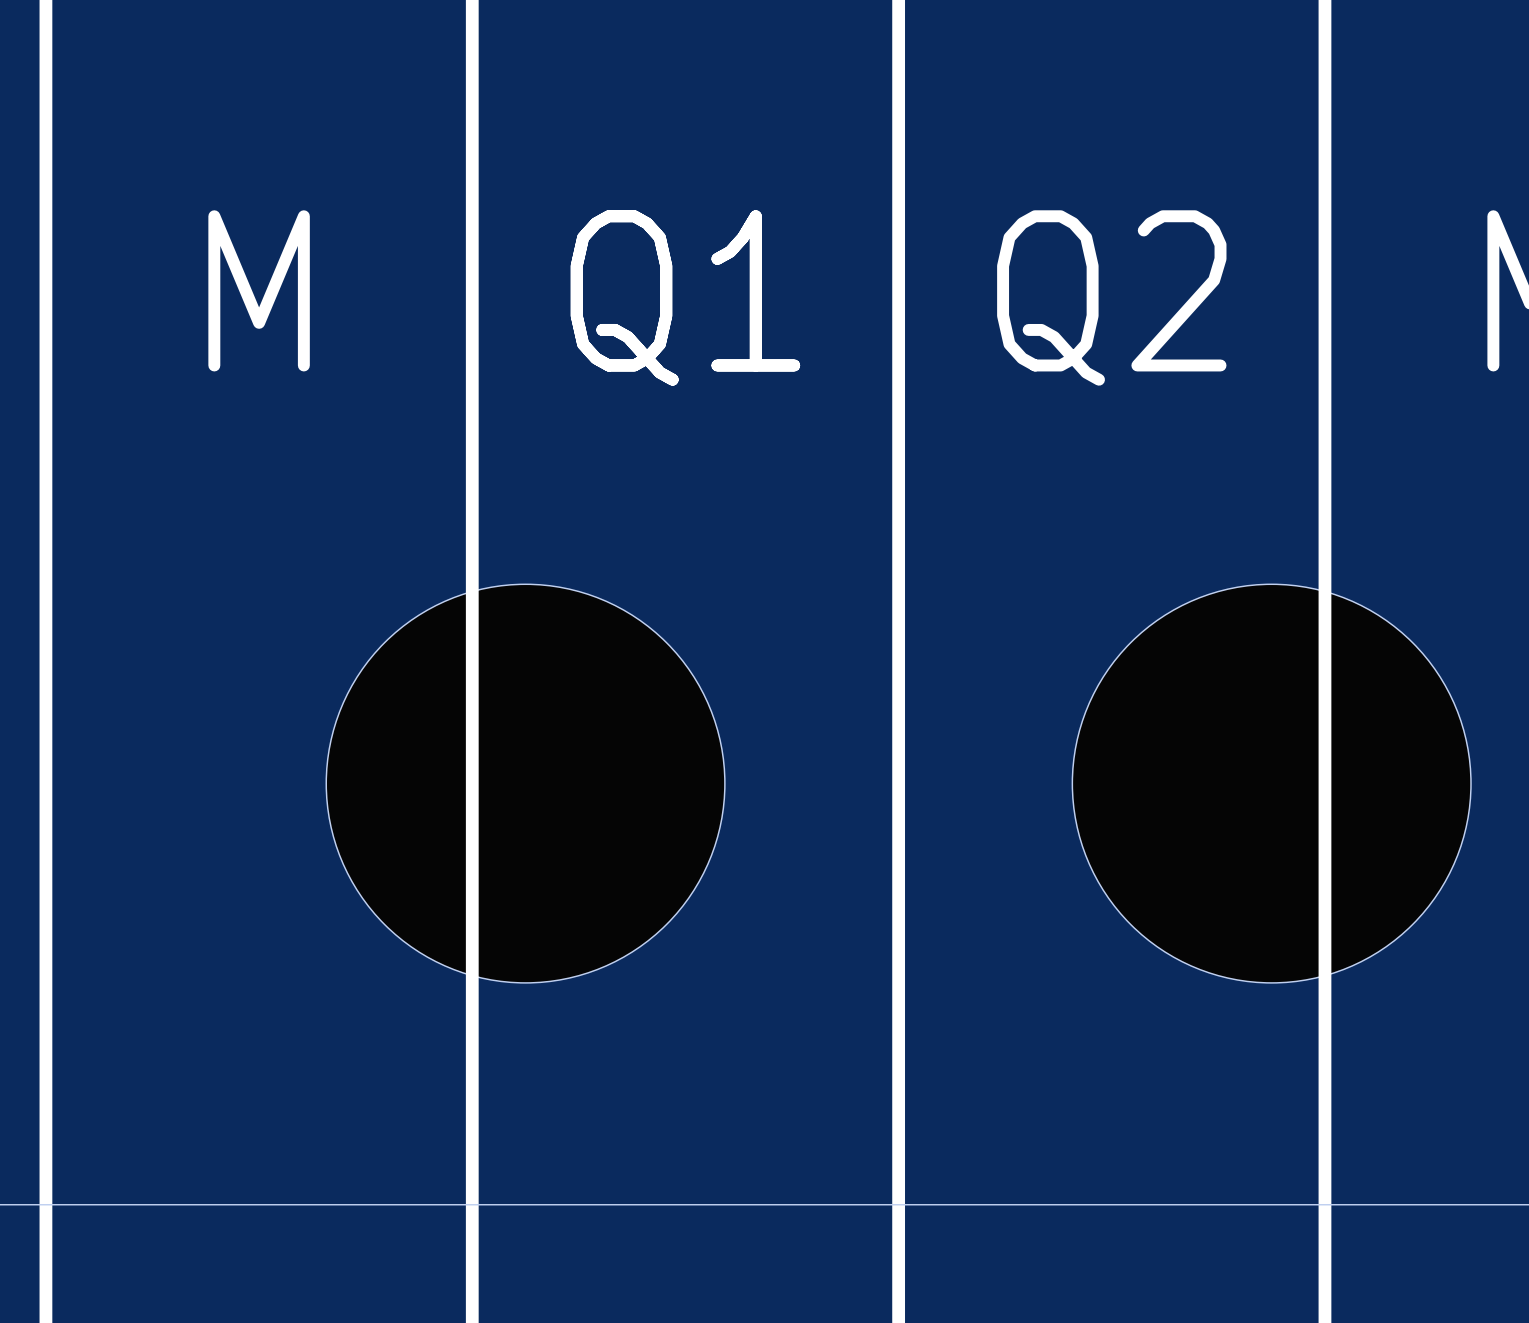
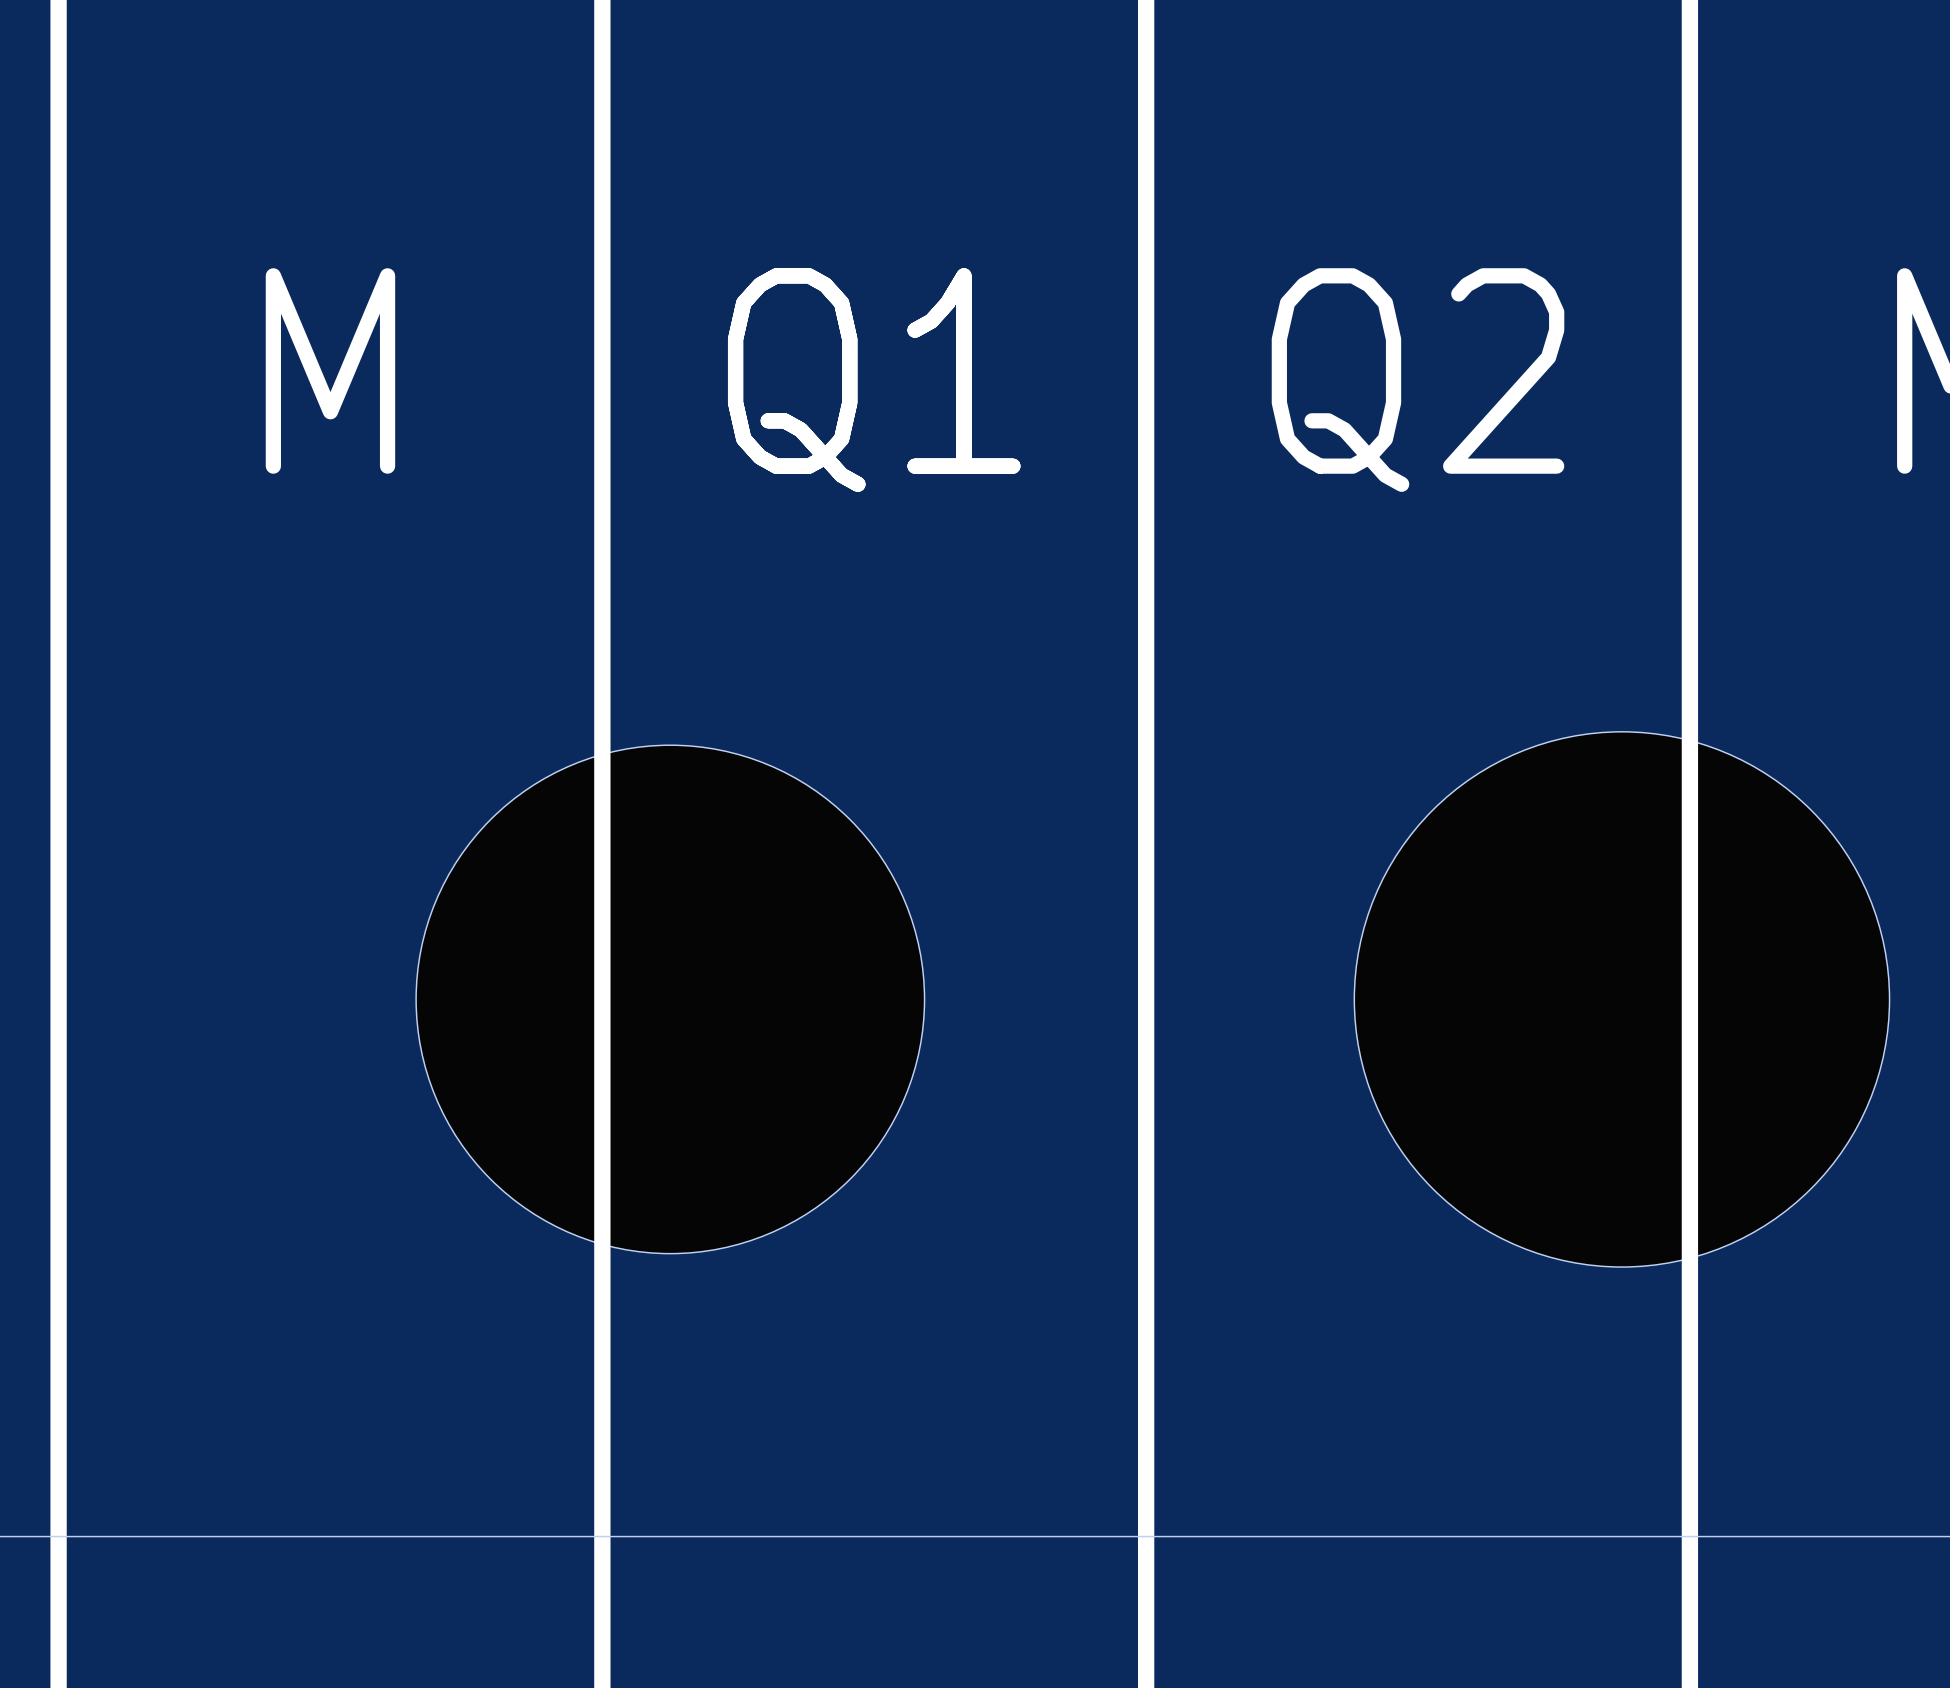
hole size: [1072, 584, 1471, 983] -> [1354, 731, 1890, 1268]

